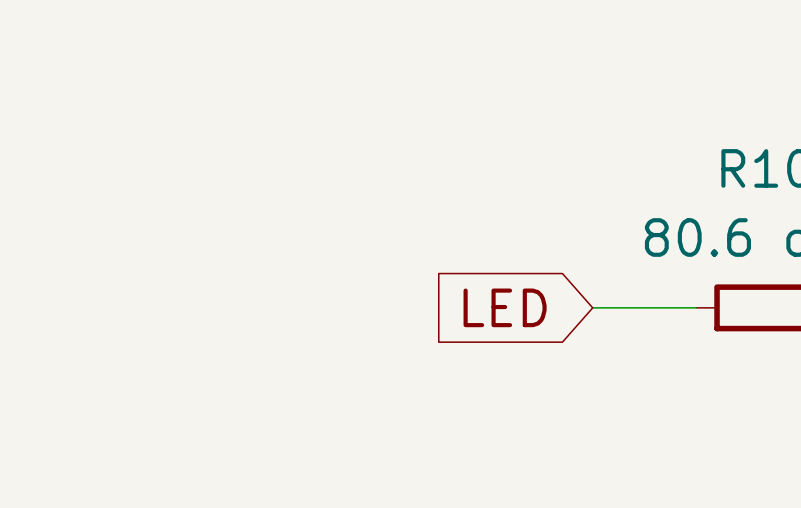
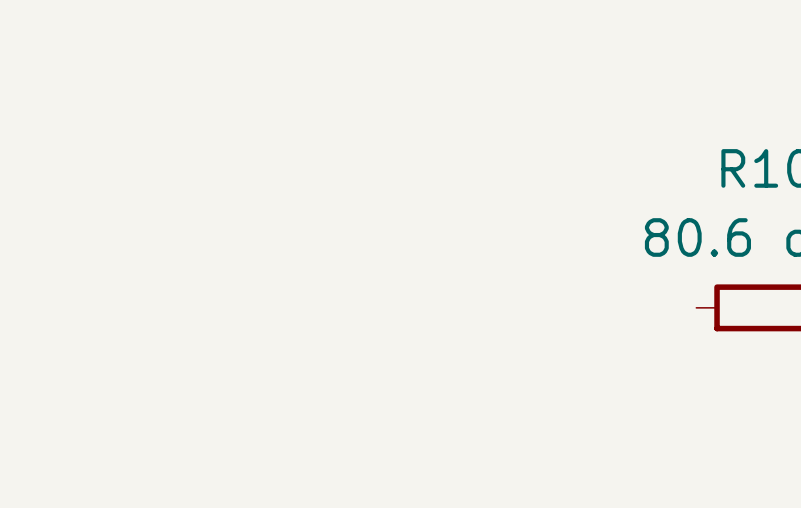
global label: LED (505, 307) -> none
wire: (592, 307) (696, 307) -> none

